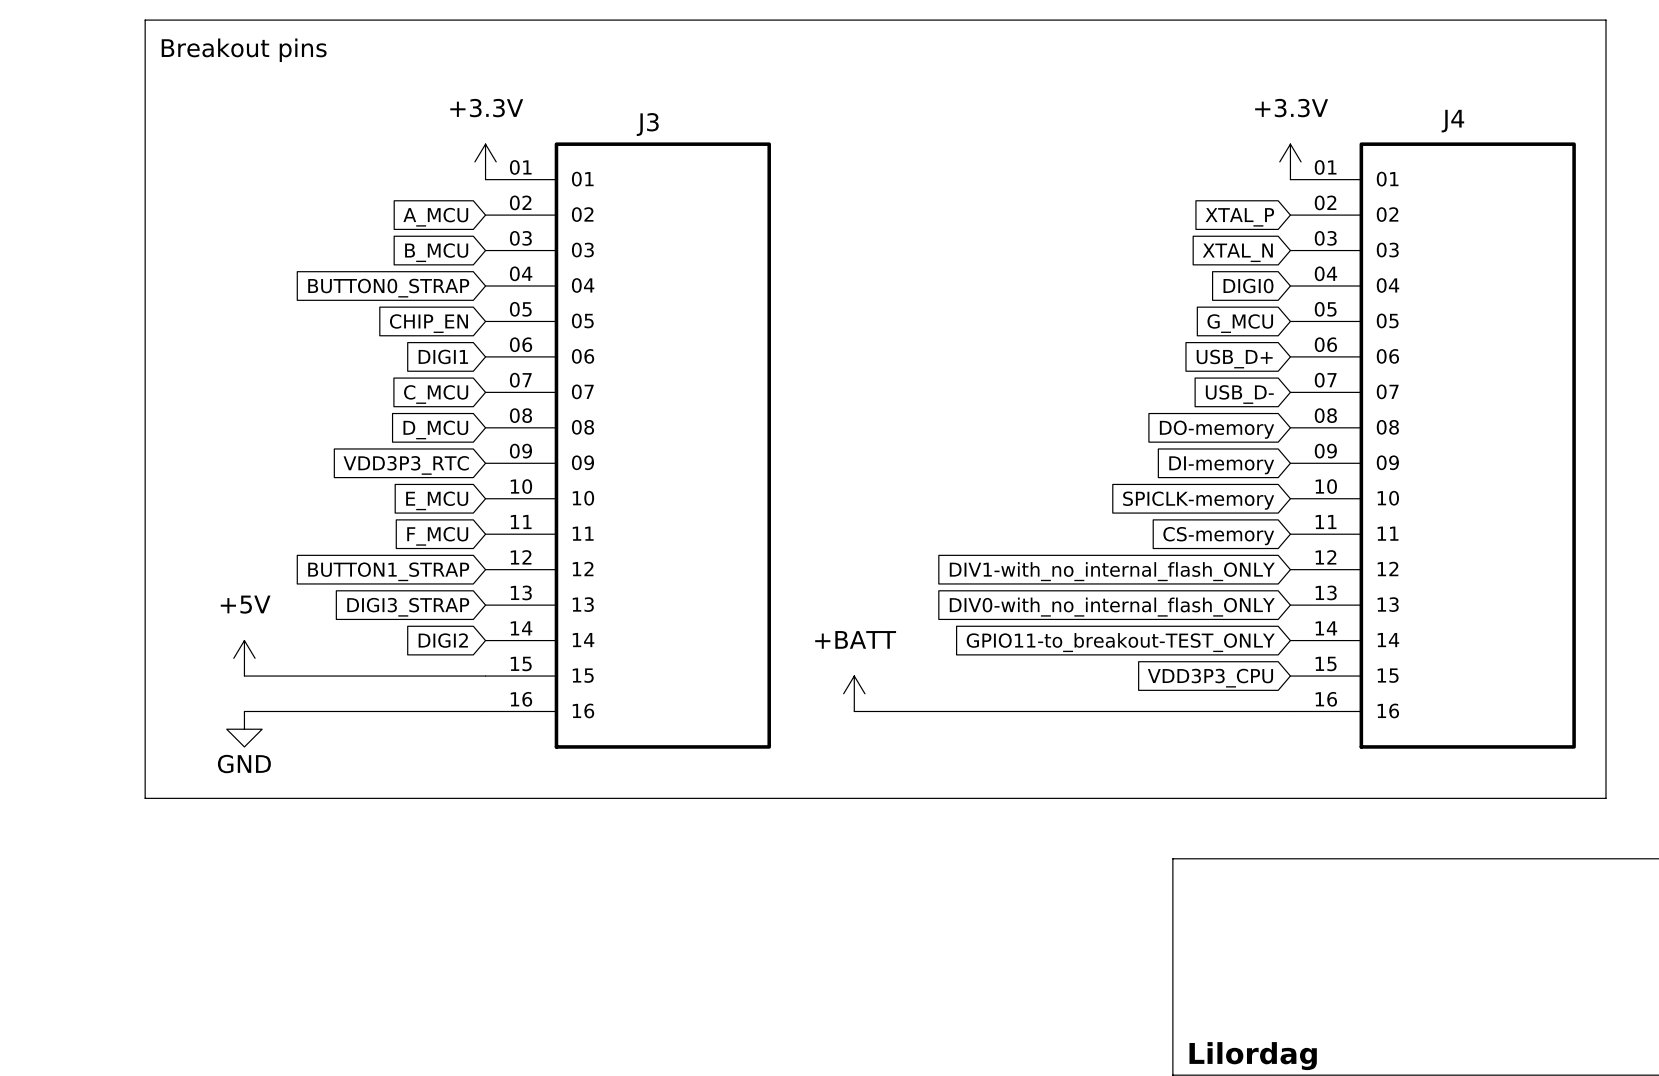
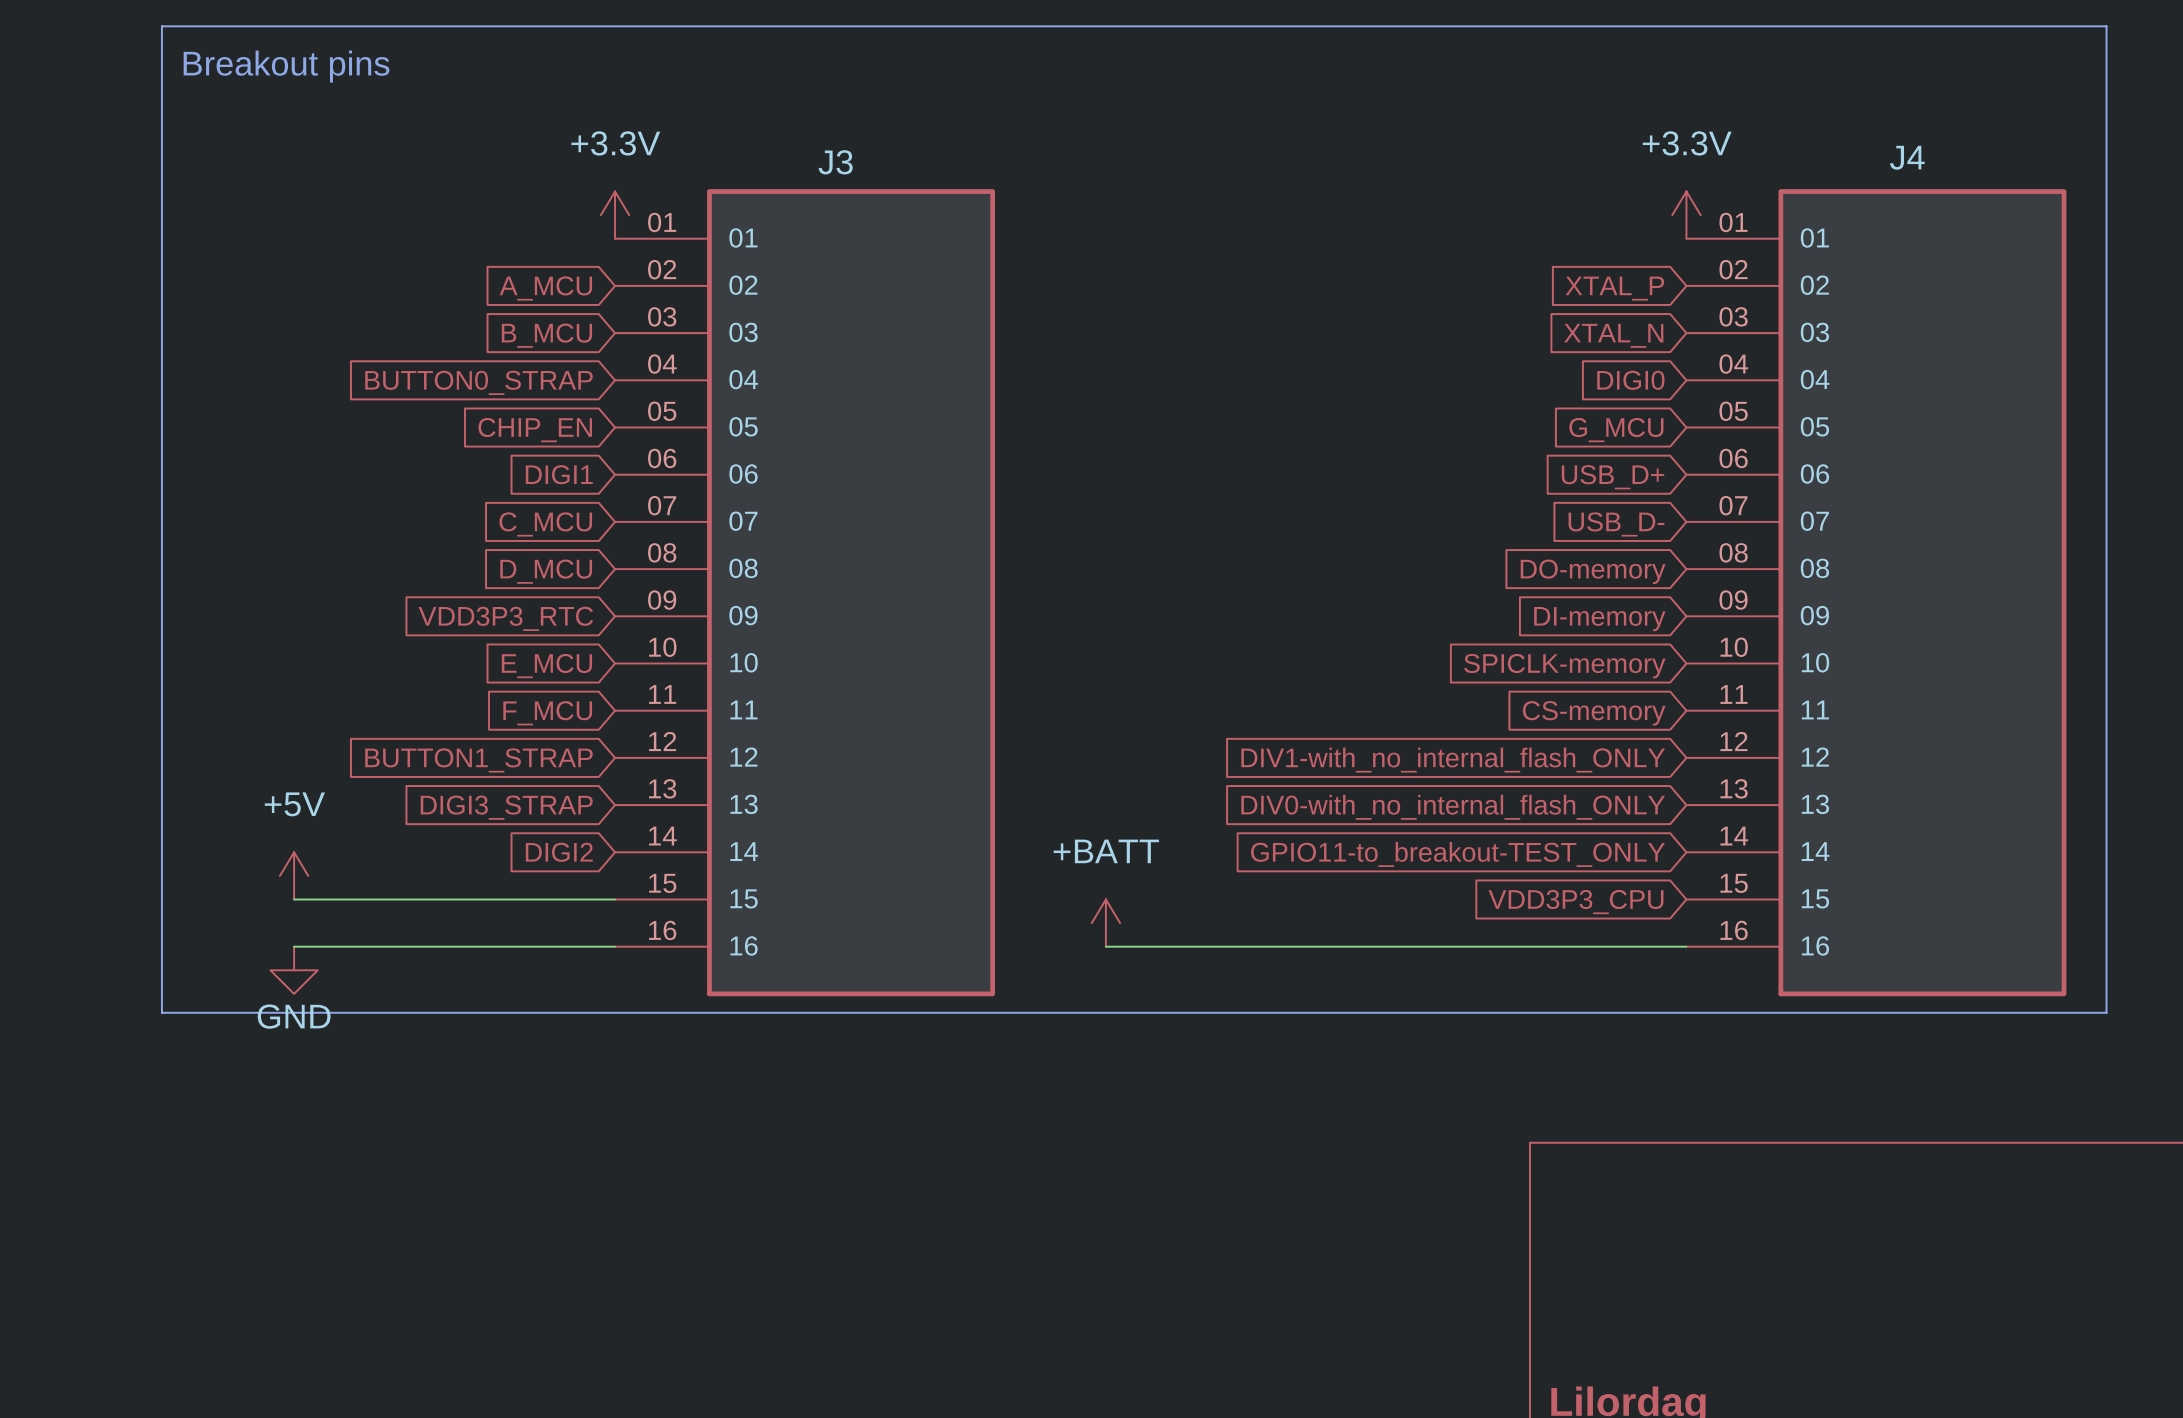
line: (145, 761) (145, 798) (1605, 798) (1605, 761) -> (161, 1012) (2106, 1012)

